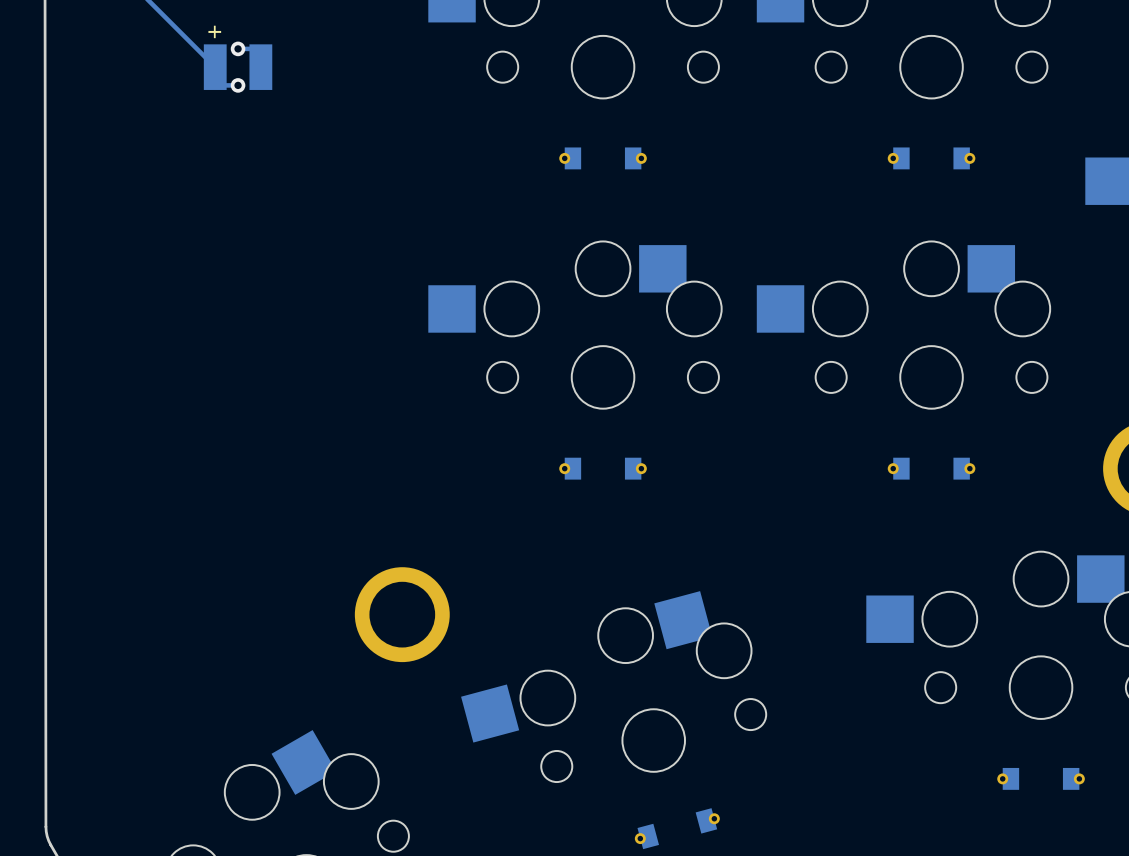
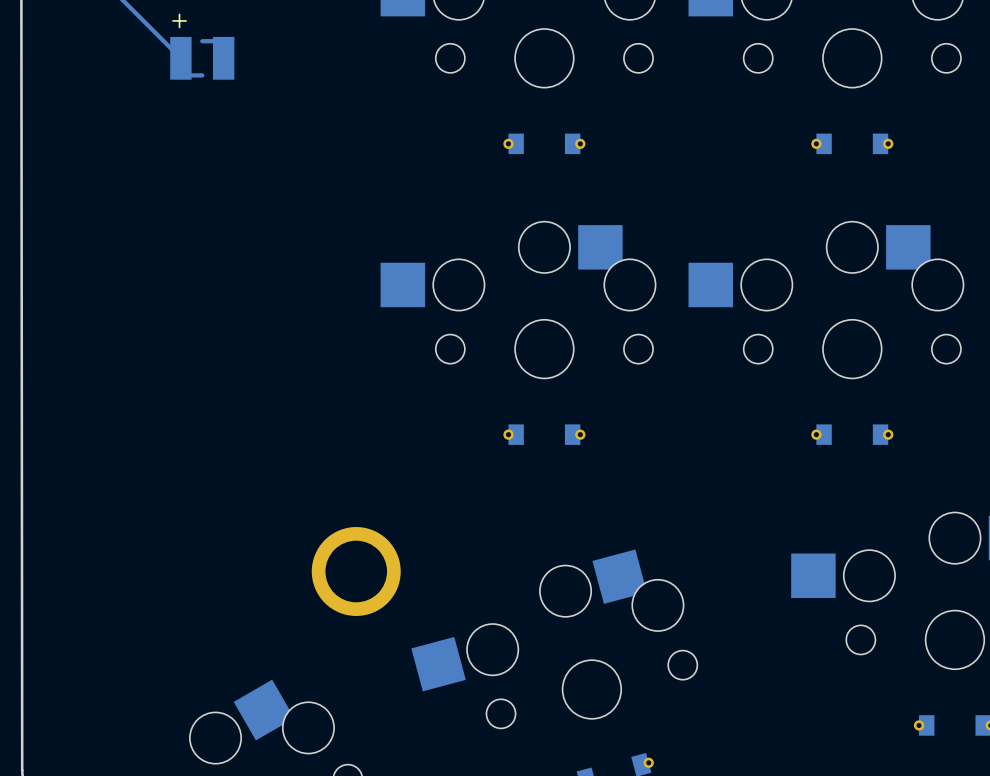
via: (238, 48) -> none
via: (238, 85) -> none

